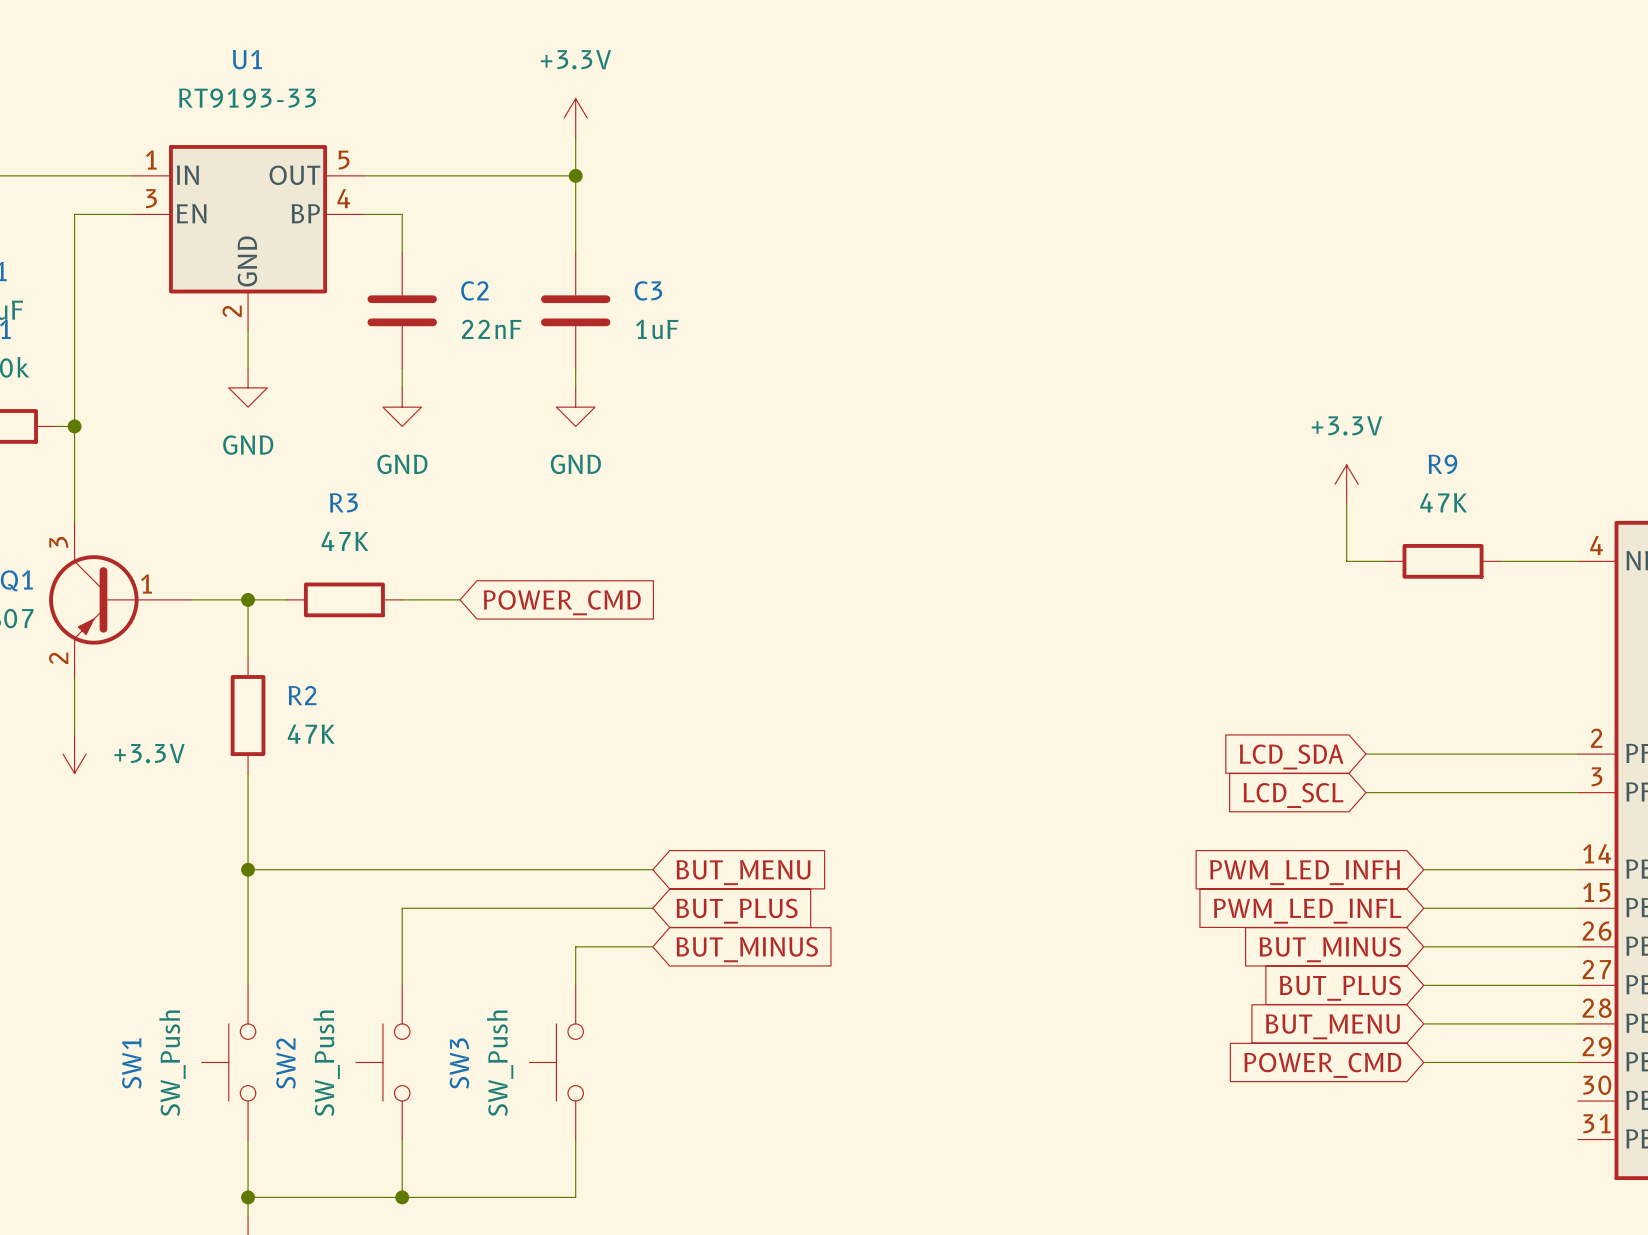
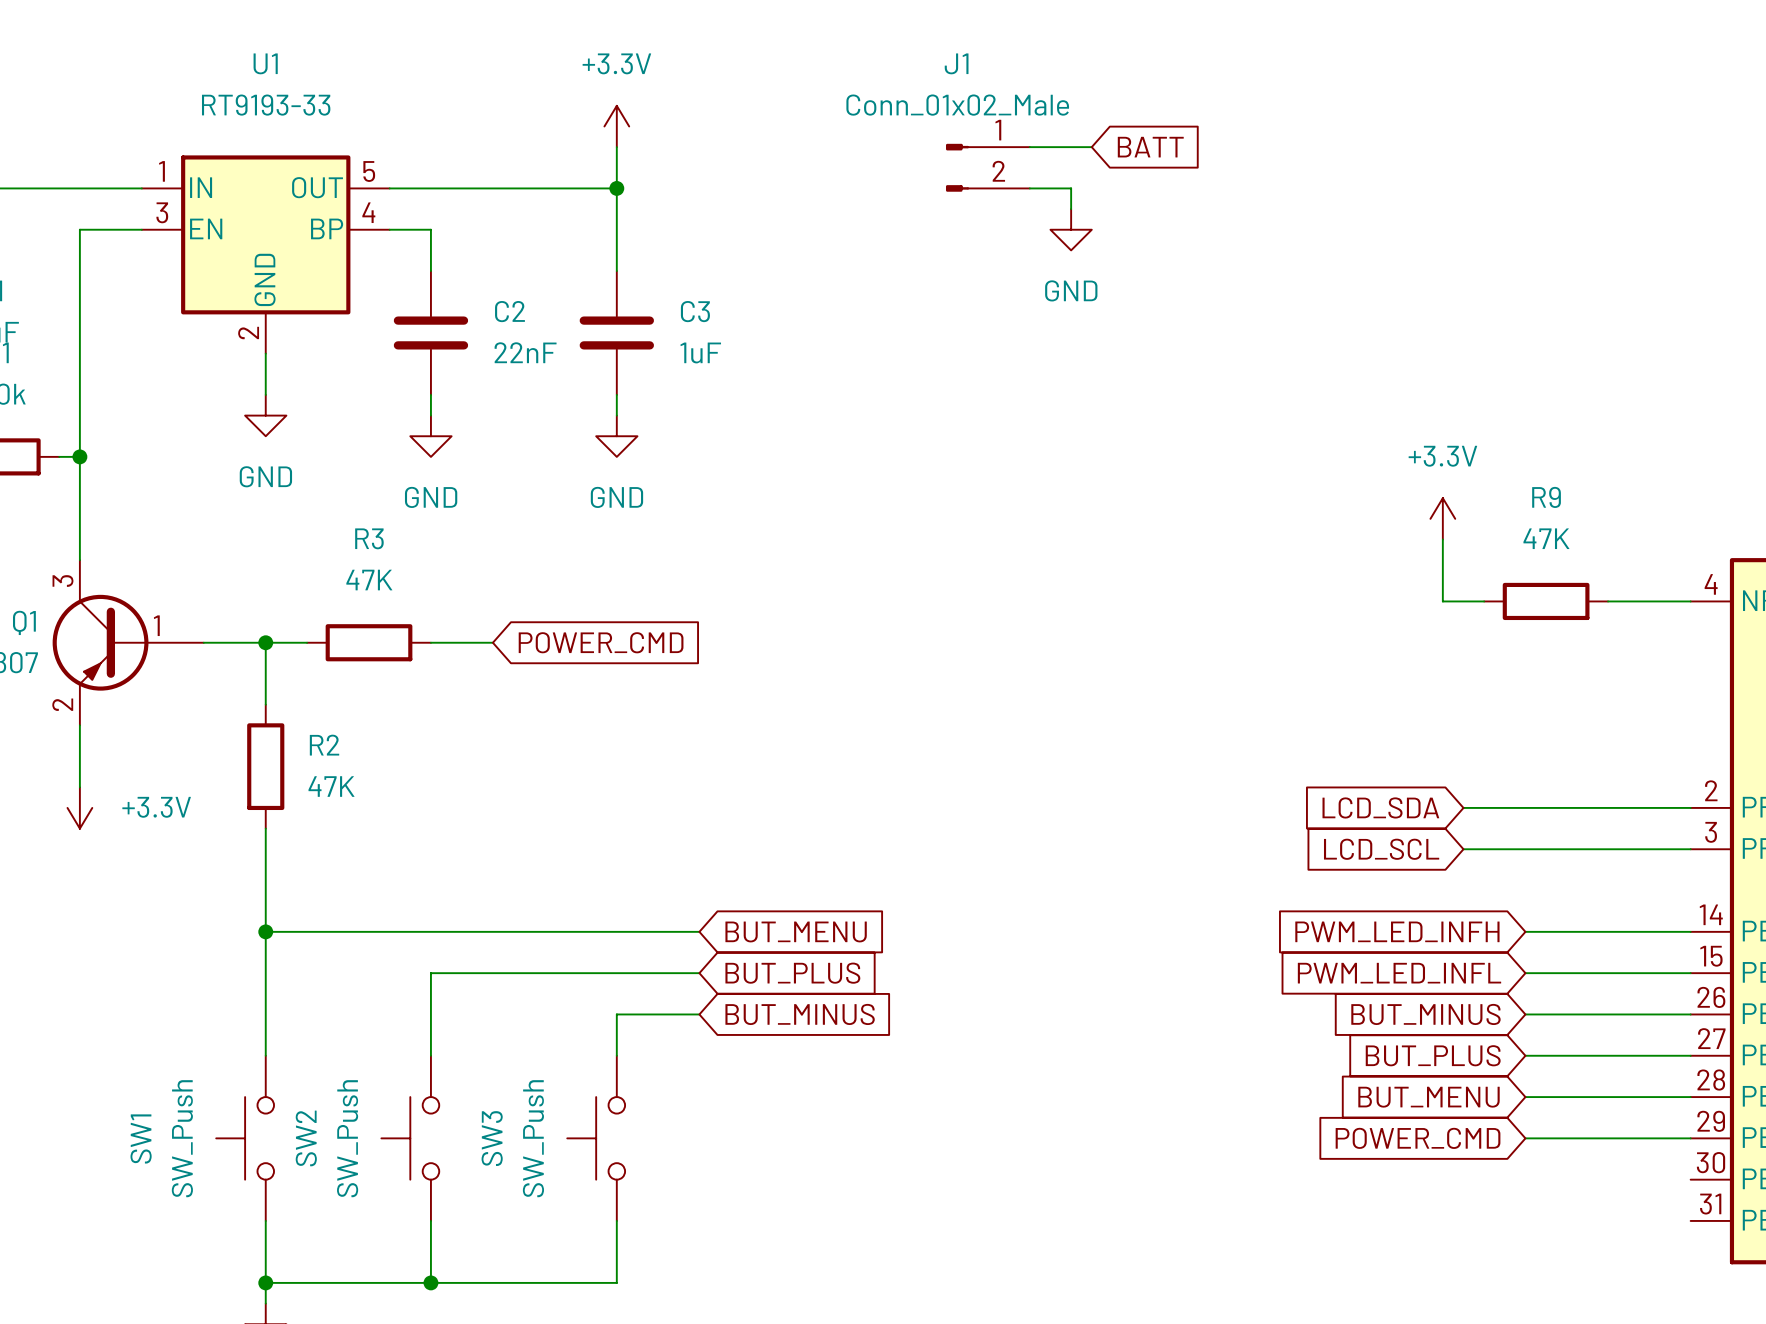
wire: none -> (1029, 147) (1091, 147)
global label: none -> BATT (1150, 147)
J1: none -> Conn_01x02_Male (987, 167)
wire: none -> (1029, 188) (1071, 188) (1071, 209)
power symbol: none -> GND (1071, 229)

